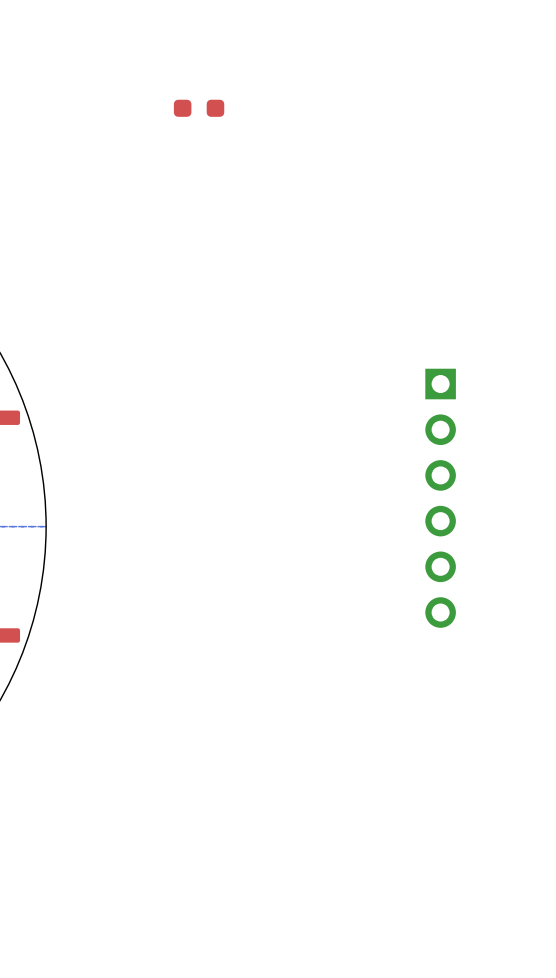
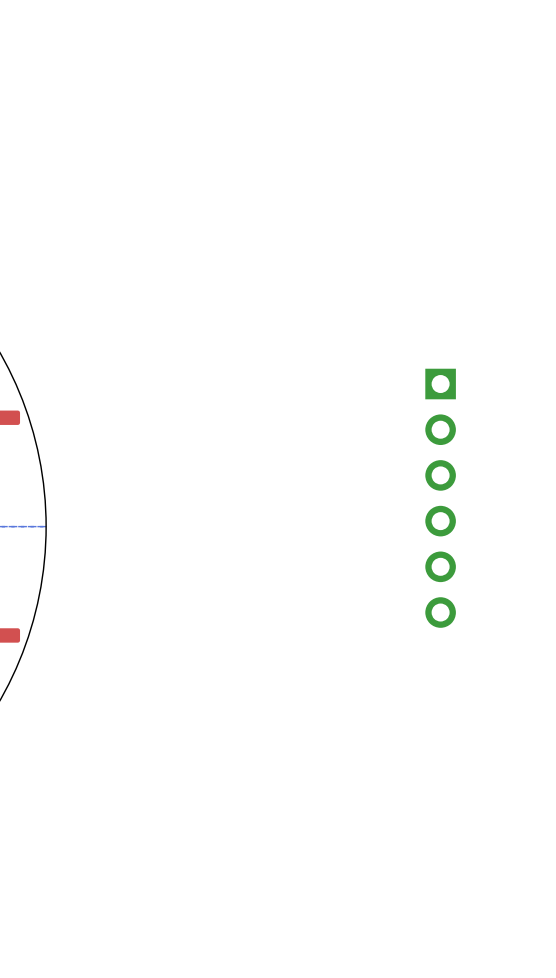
part: (199, 108) -> none

